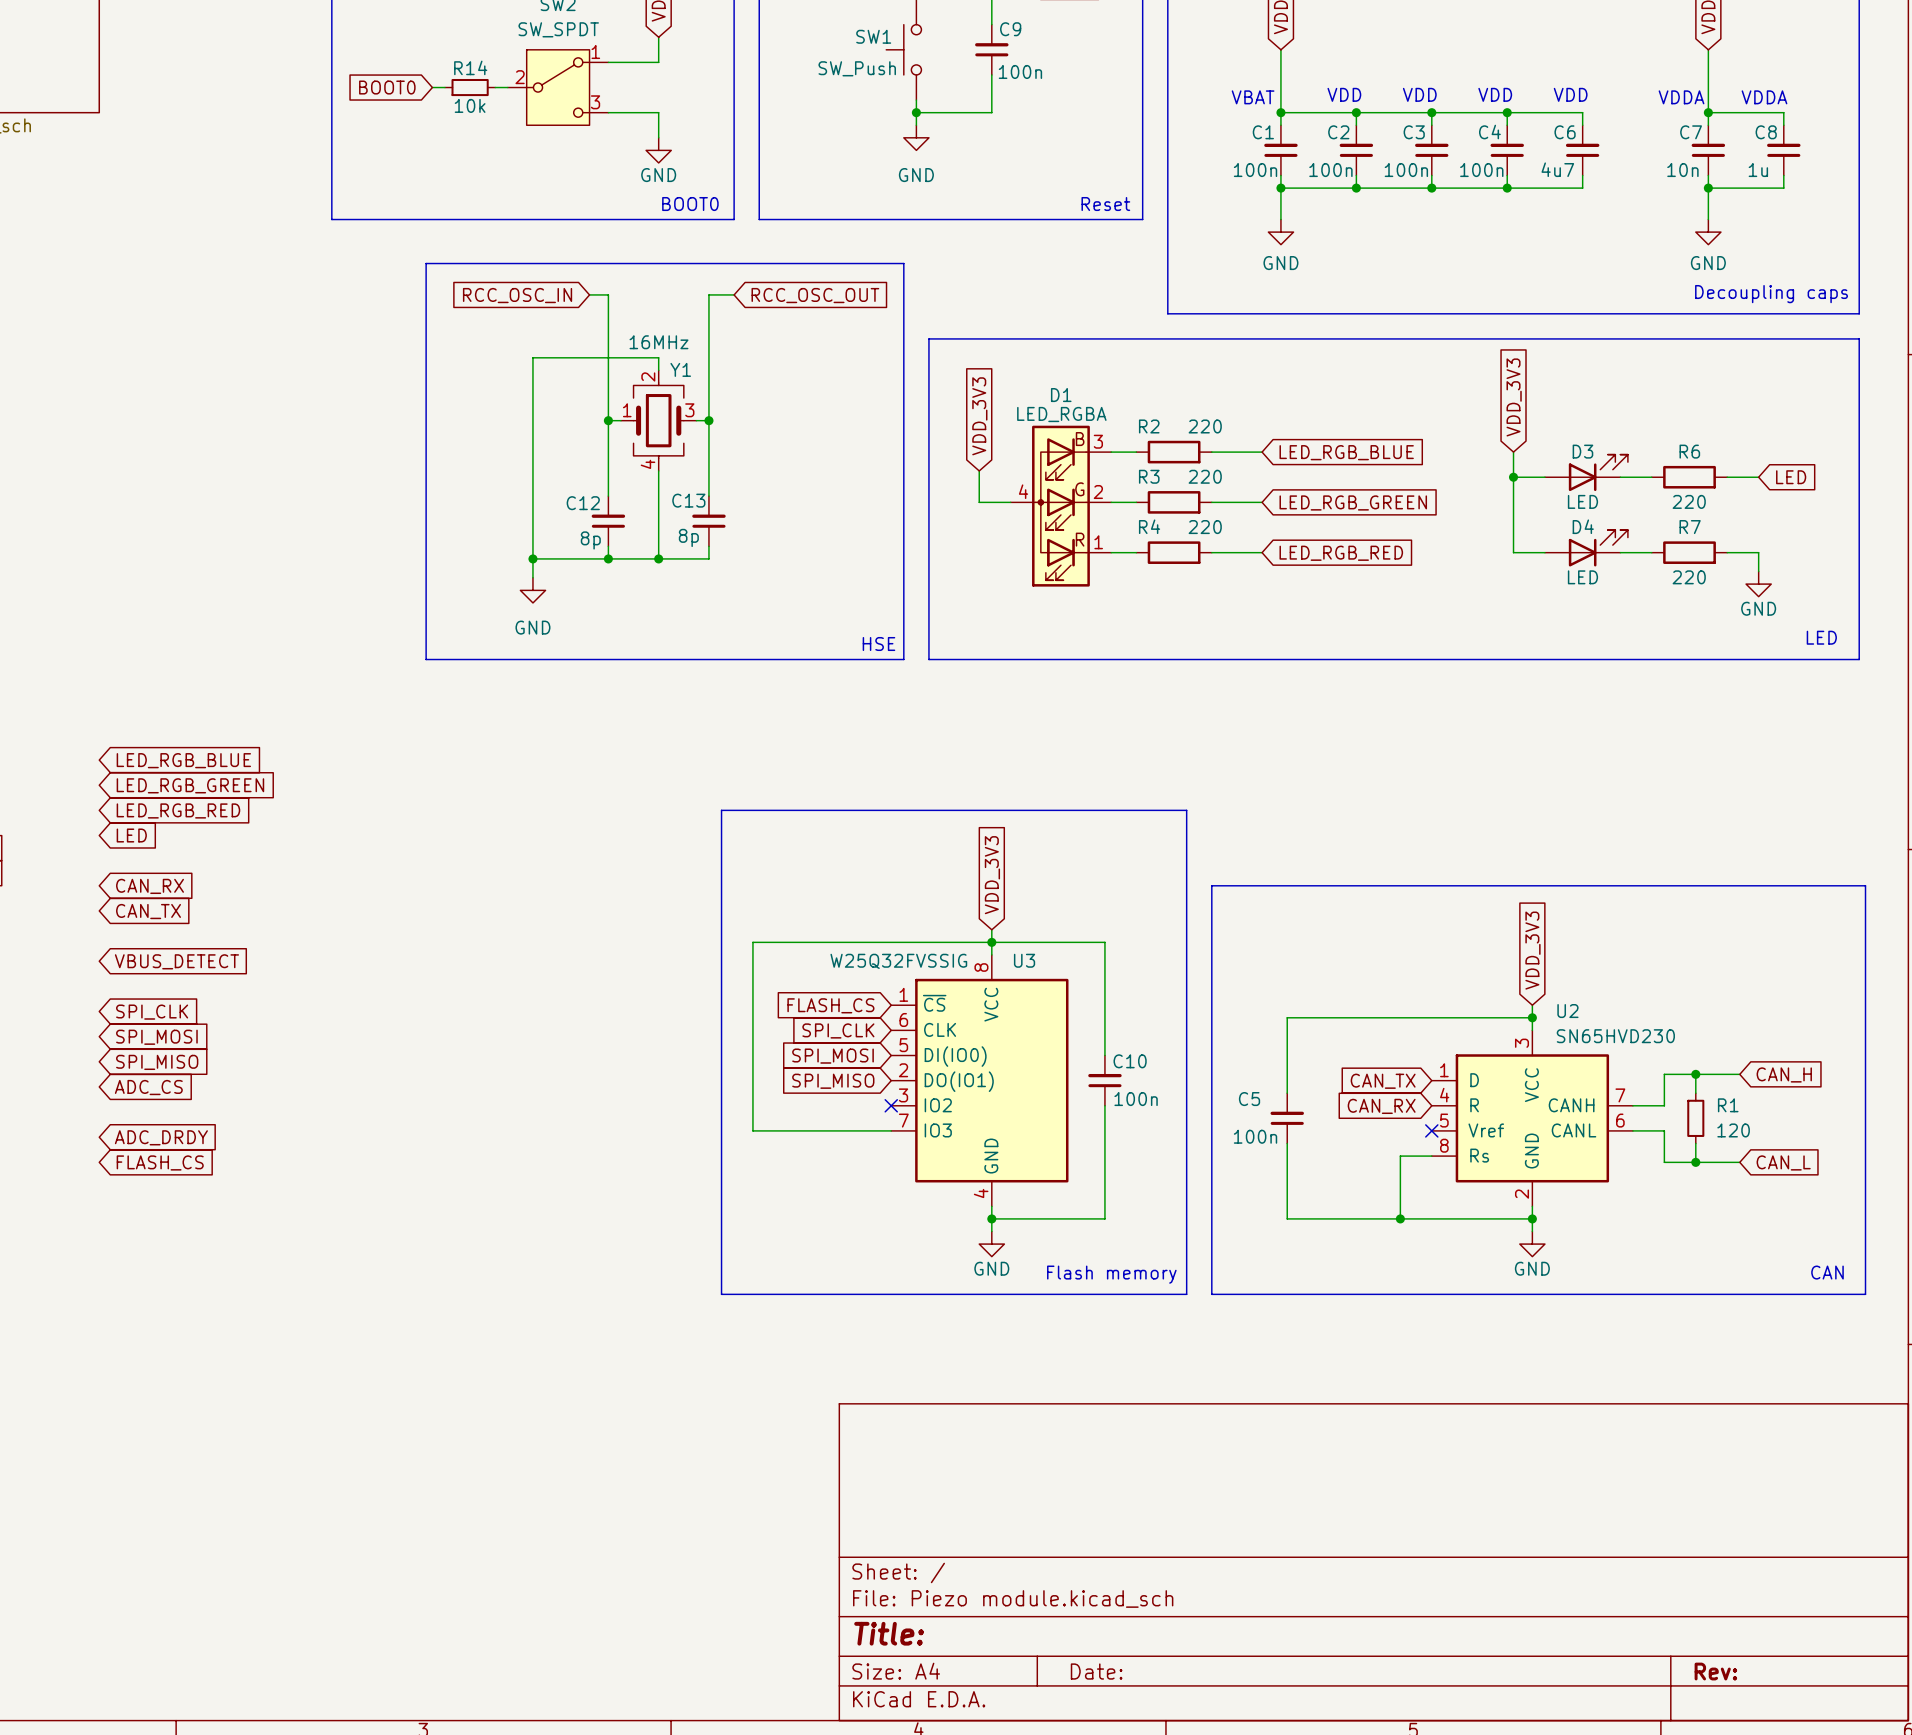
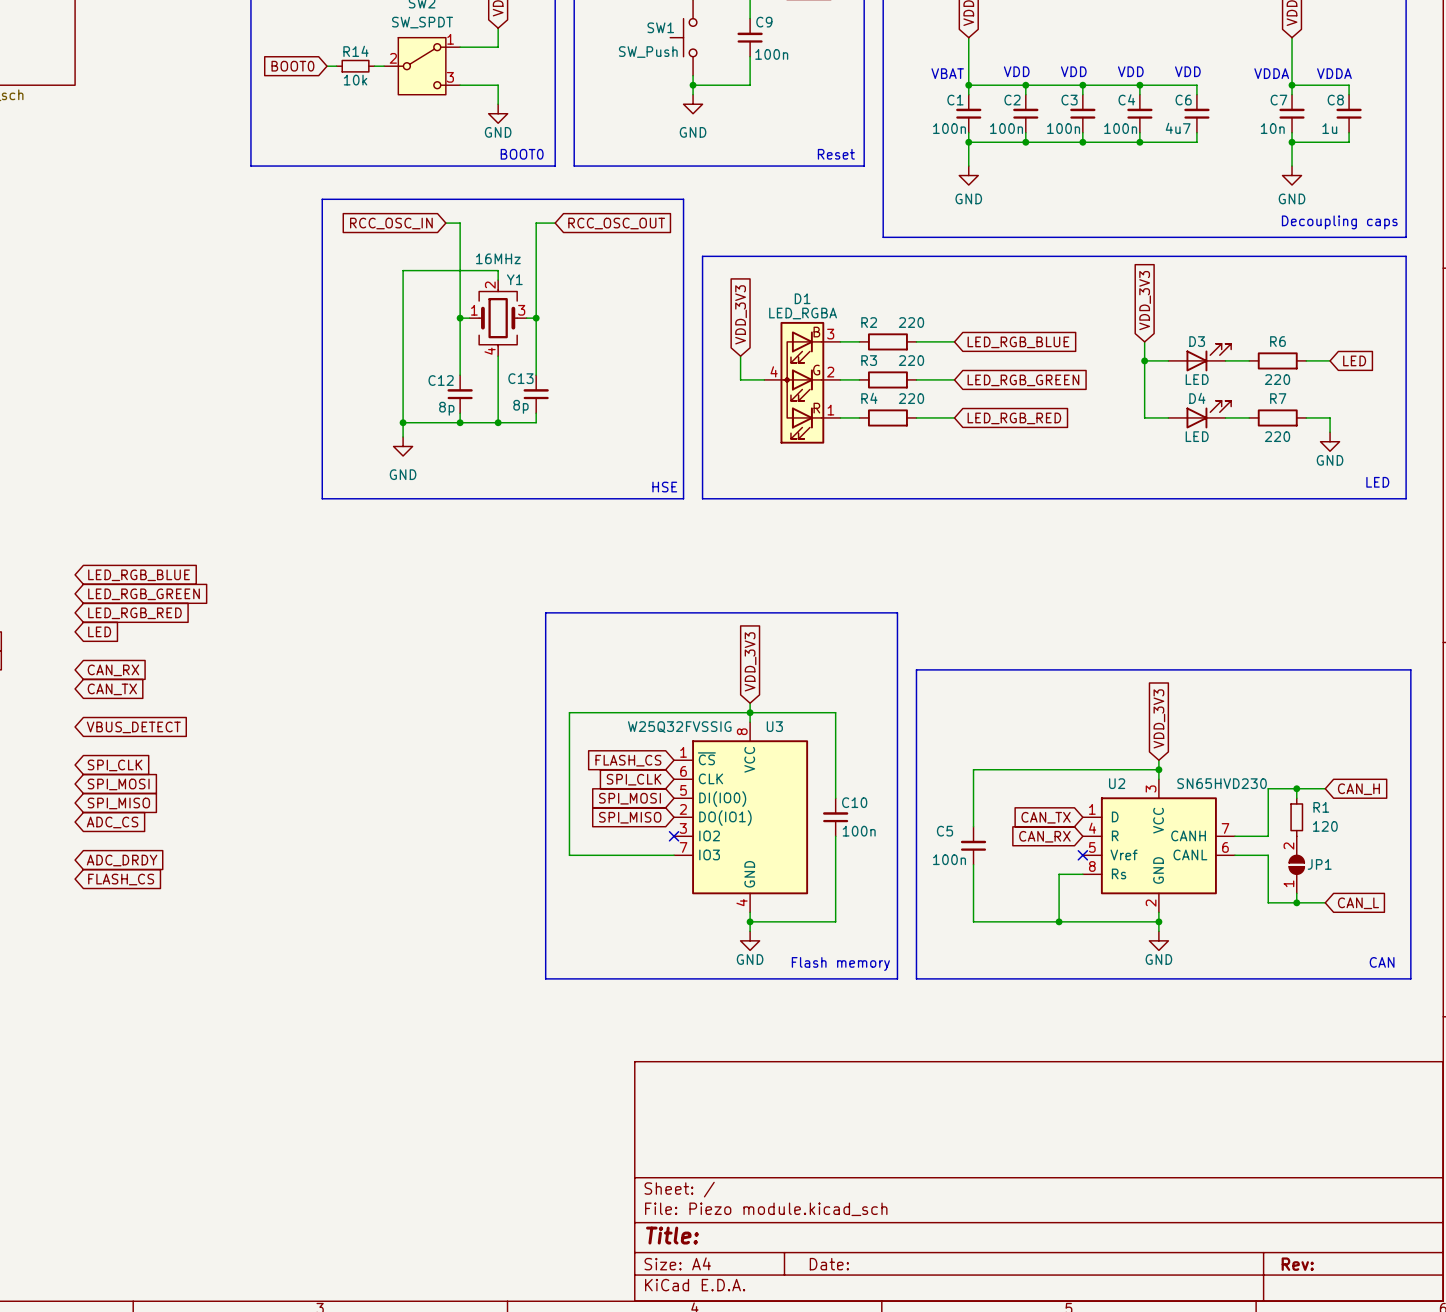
U2 name position: U2 (1567, 1011) -> U2 (1117, 783)
wire: none -> (1296, 788) (1296, 798)
wire: (1695, 1074) (1695, 1093) -> none
junction position: (1695, 1074) -> (1296, 788)
wire: (1739, 1074) (1664, 1074) (1664, 1105) -> (1325, 788) (1268, 788) (1268, 836) (1258, 836)
global label position: CAN_H (1784, 1074) -> CAN_H (1358, 789)
R1 position: (1695, 1118) -> (1296, 817)
wire: (1664, 1130) (1664, 1162) (1739, 1162) -> (1258, 855) (1268, 855) (1268, 902) (1325, 902)
wire: (1695, 1143) (1695, 1162) -> none
JP1: none -> (1296, 864)
junction position: (1695, 1162) -> (1296, 902)
global label position: CAN_L (1783, 1162) -> CAN_L (1358, 903)
wire: none -> (1296, 893) (1296, 902)

